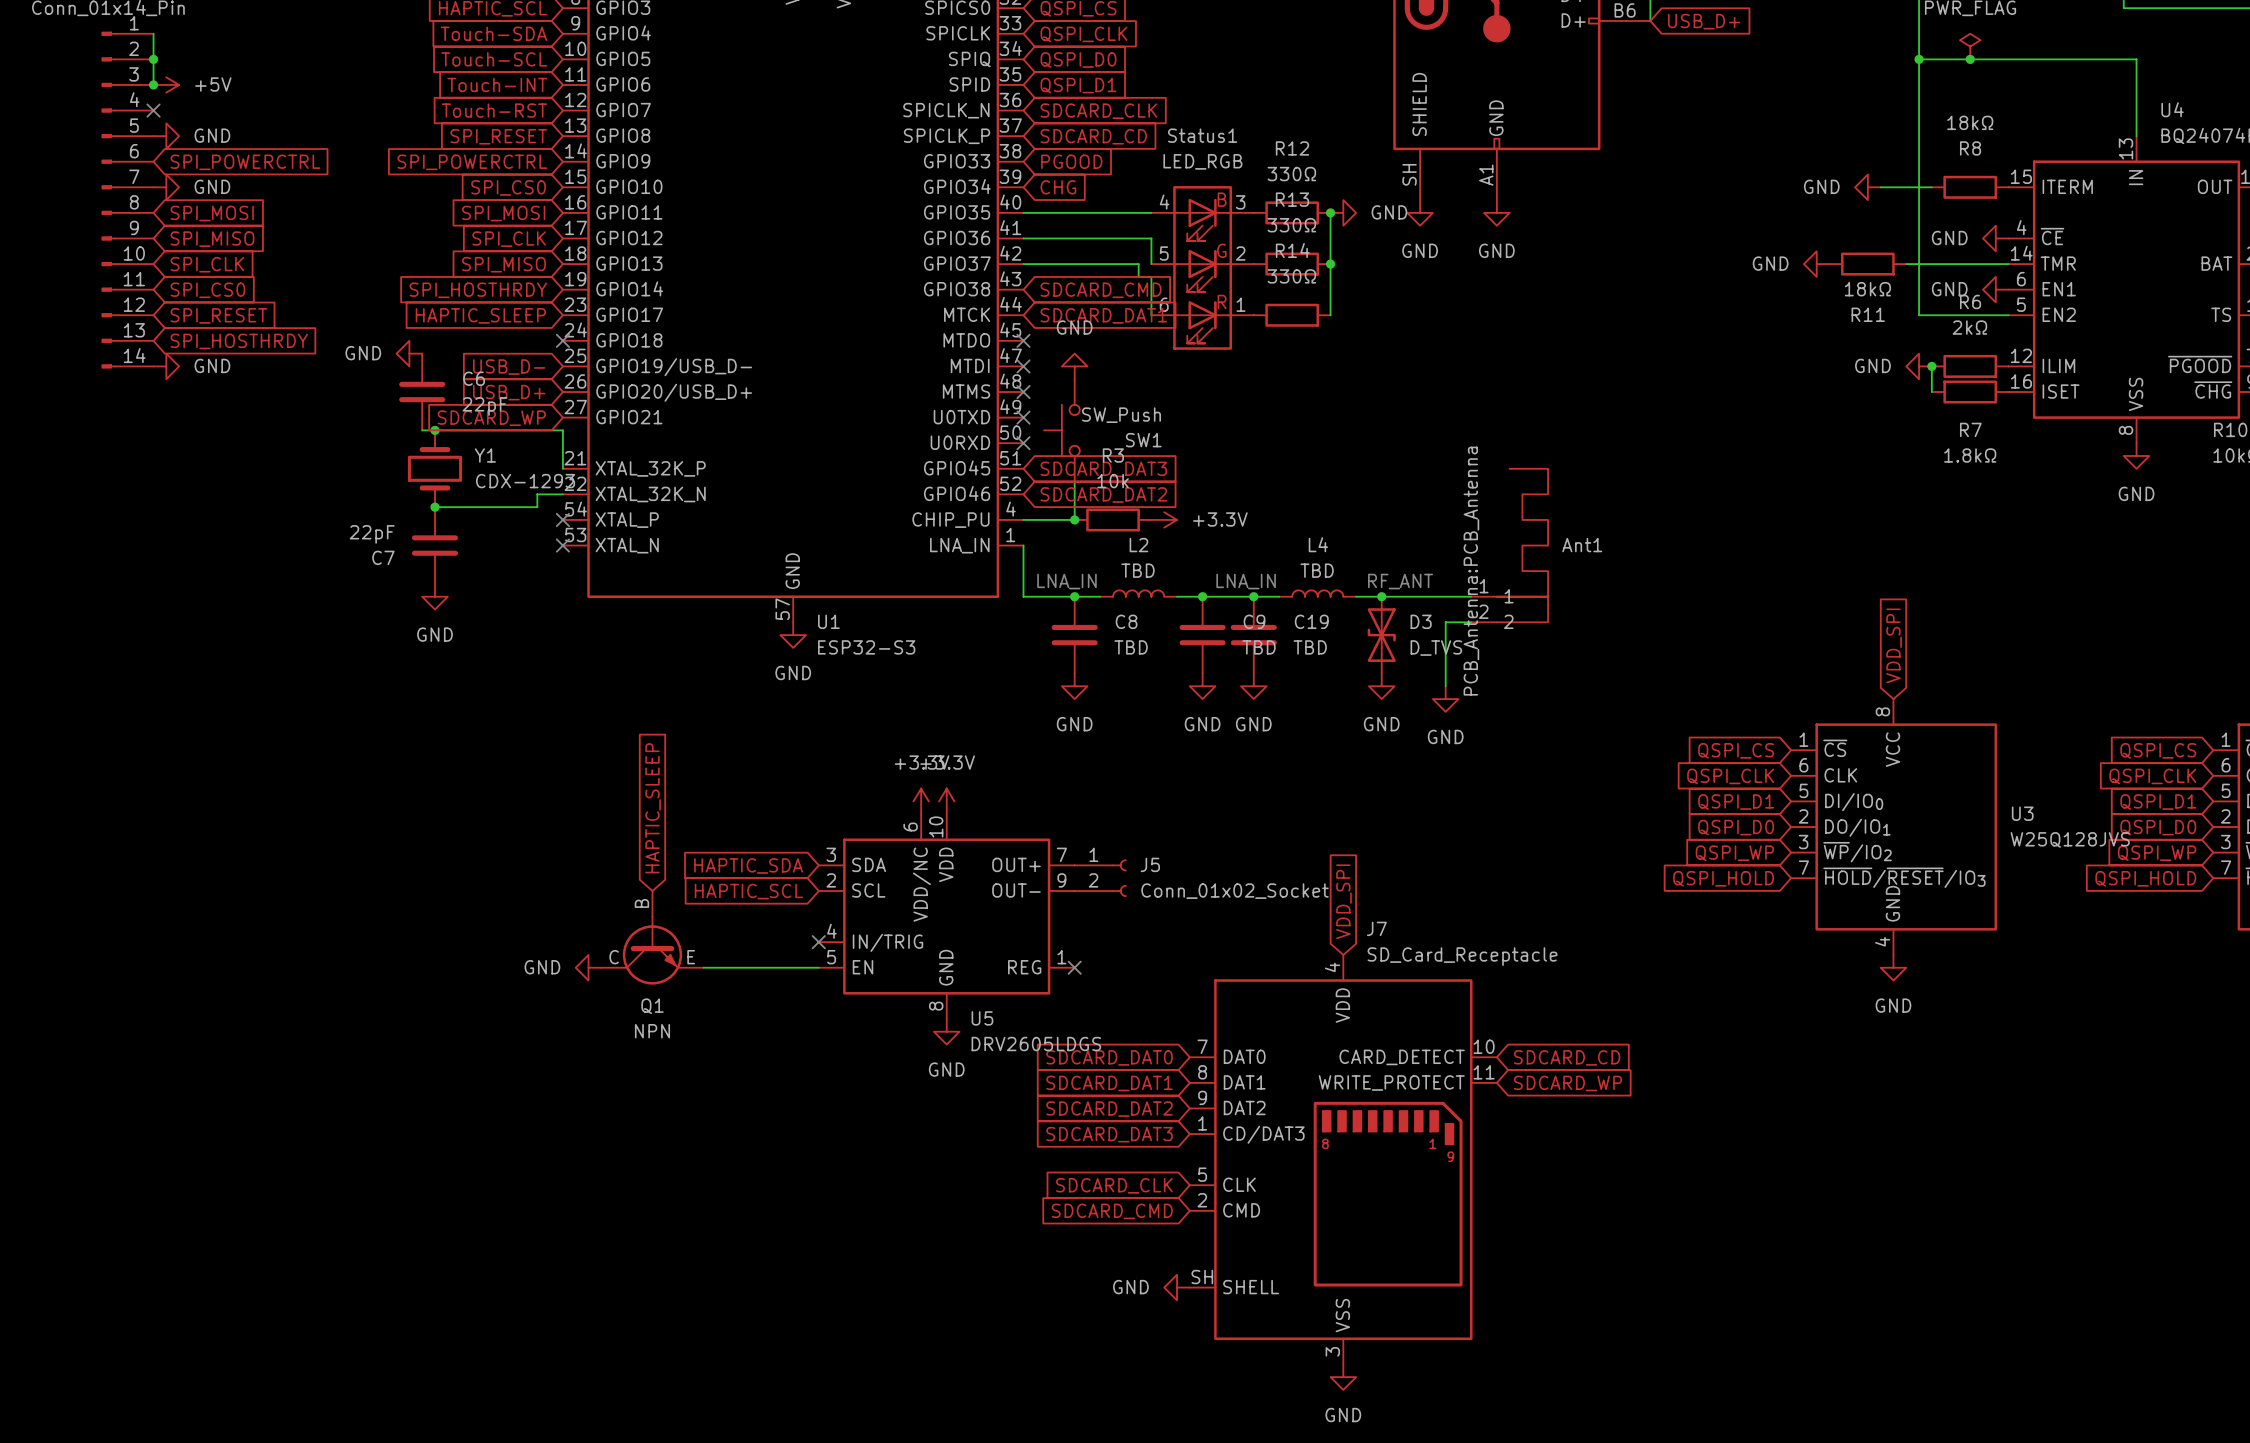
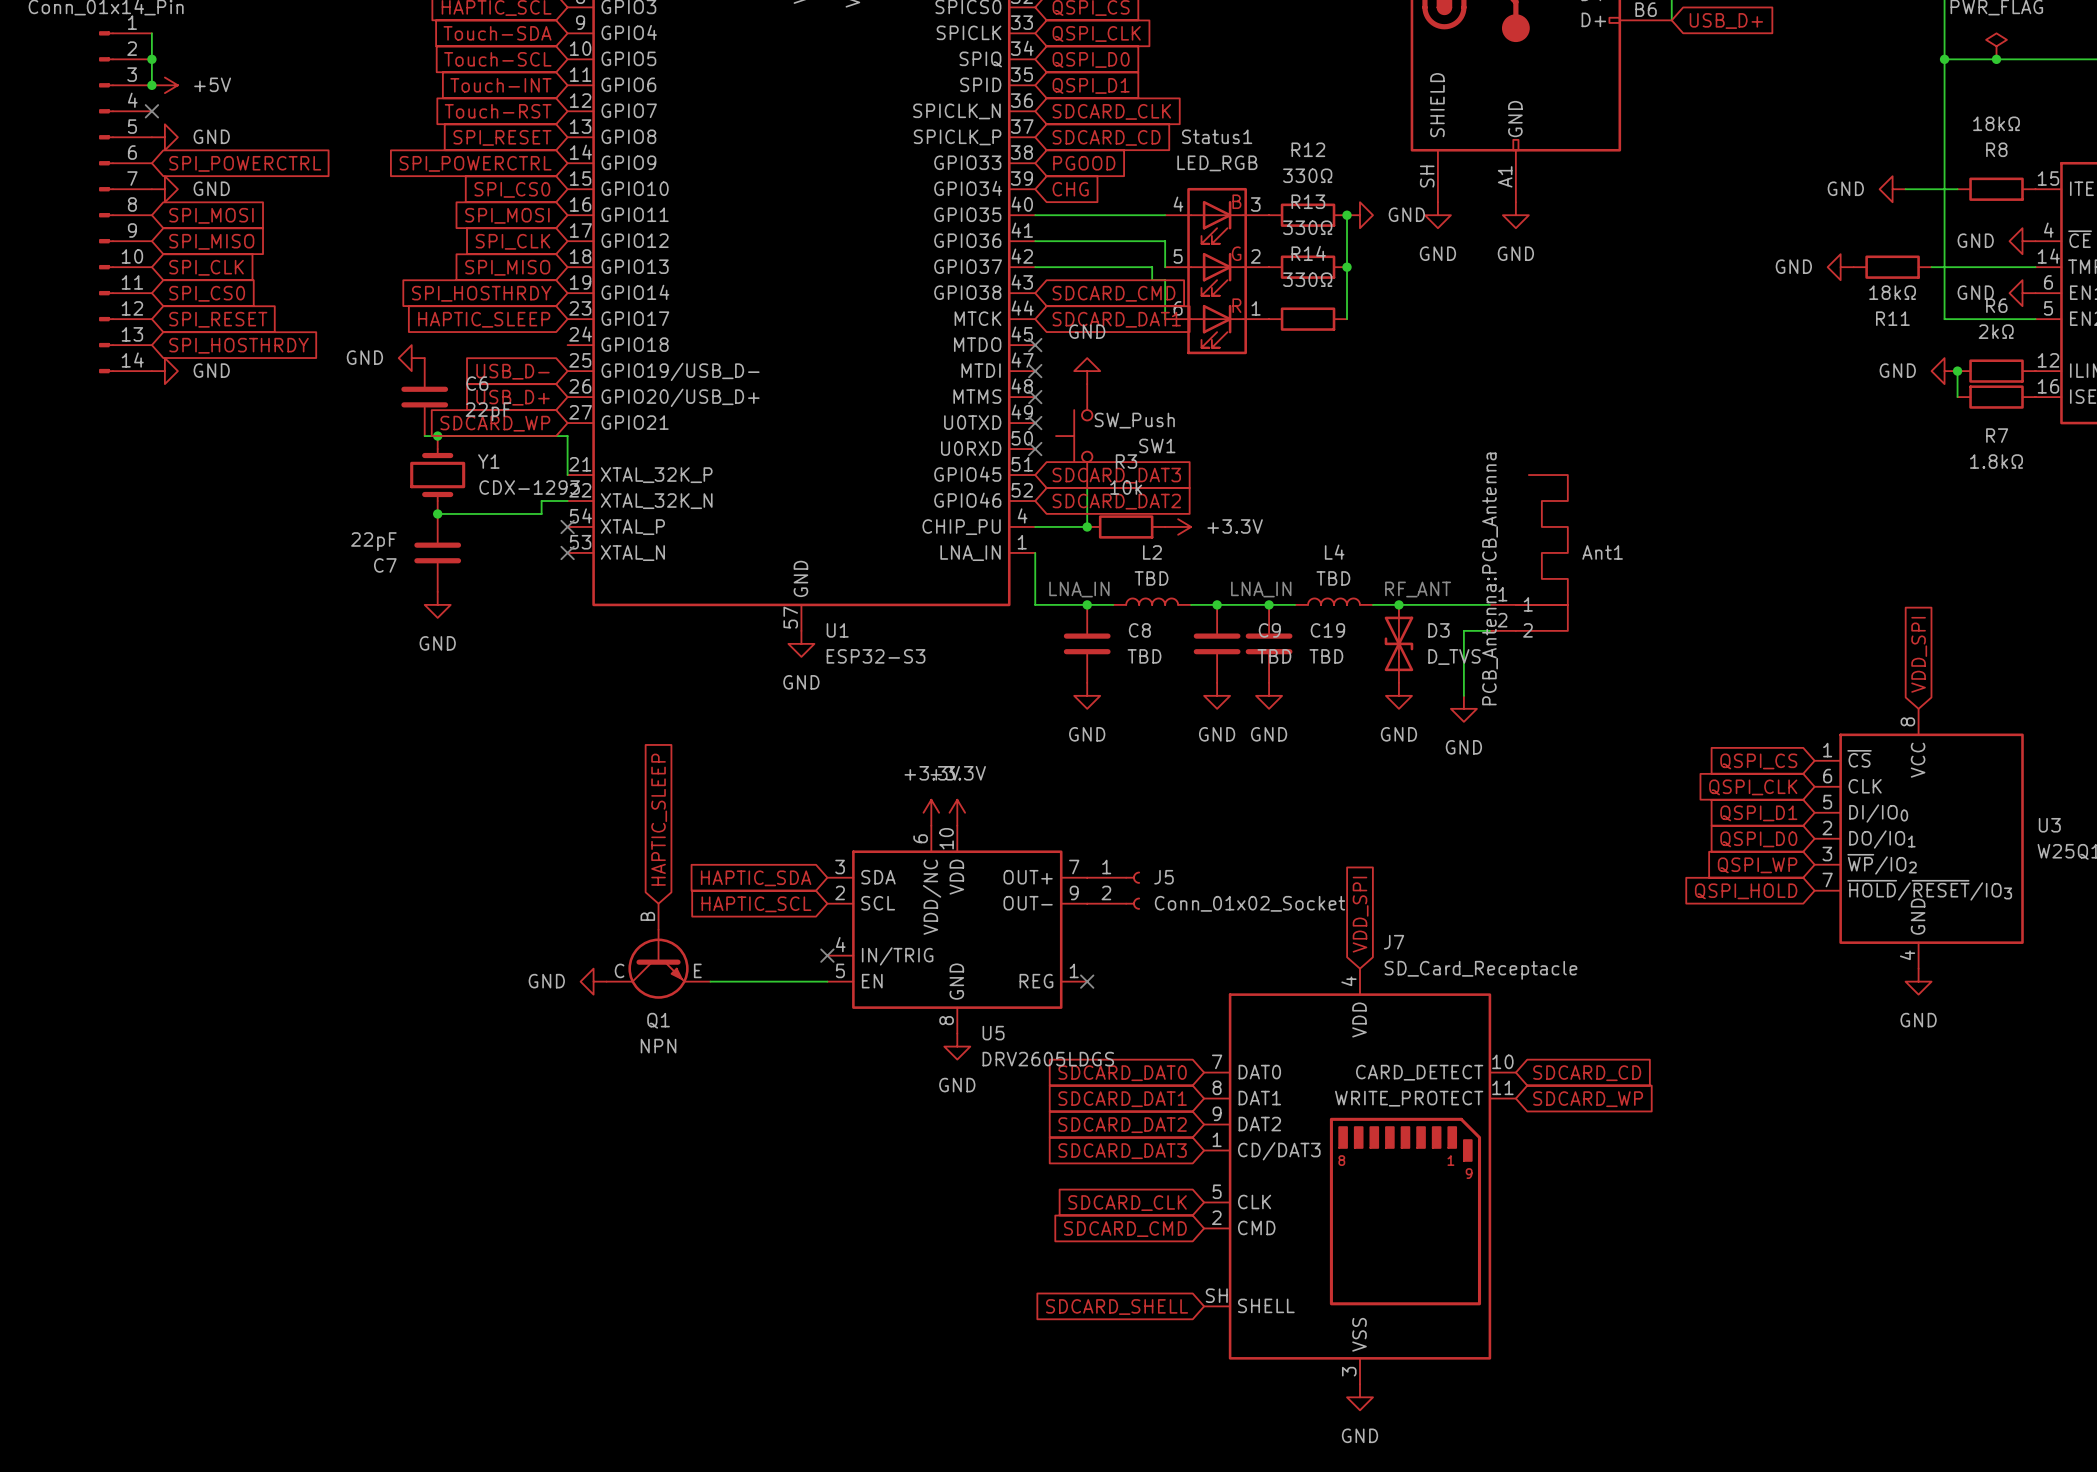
no-connect mark: (562, 340) -> none
power symbol: GND (1177, 1287) -> none
global label: none -> SDCARD_SHELL (1117, 1307)

